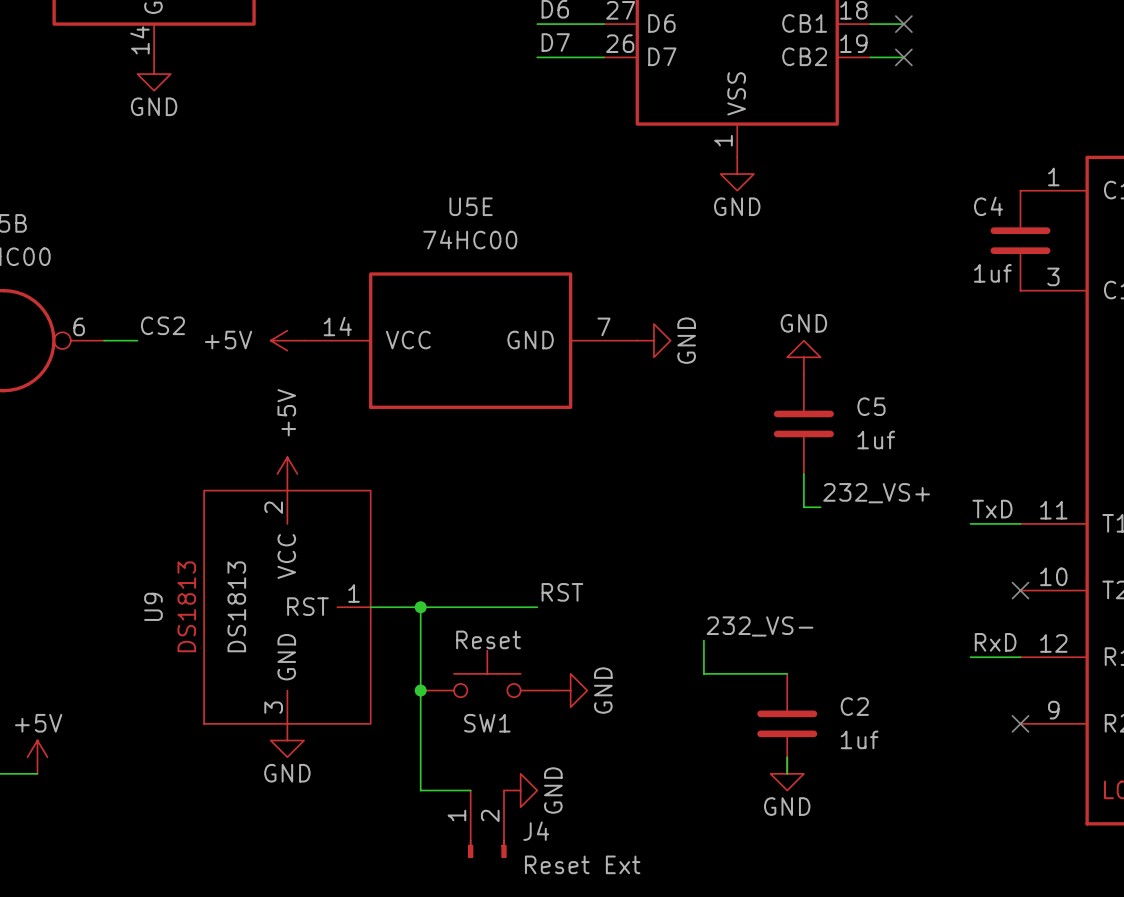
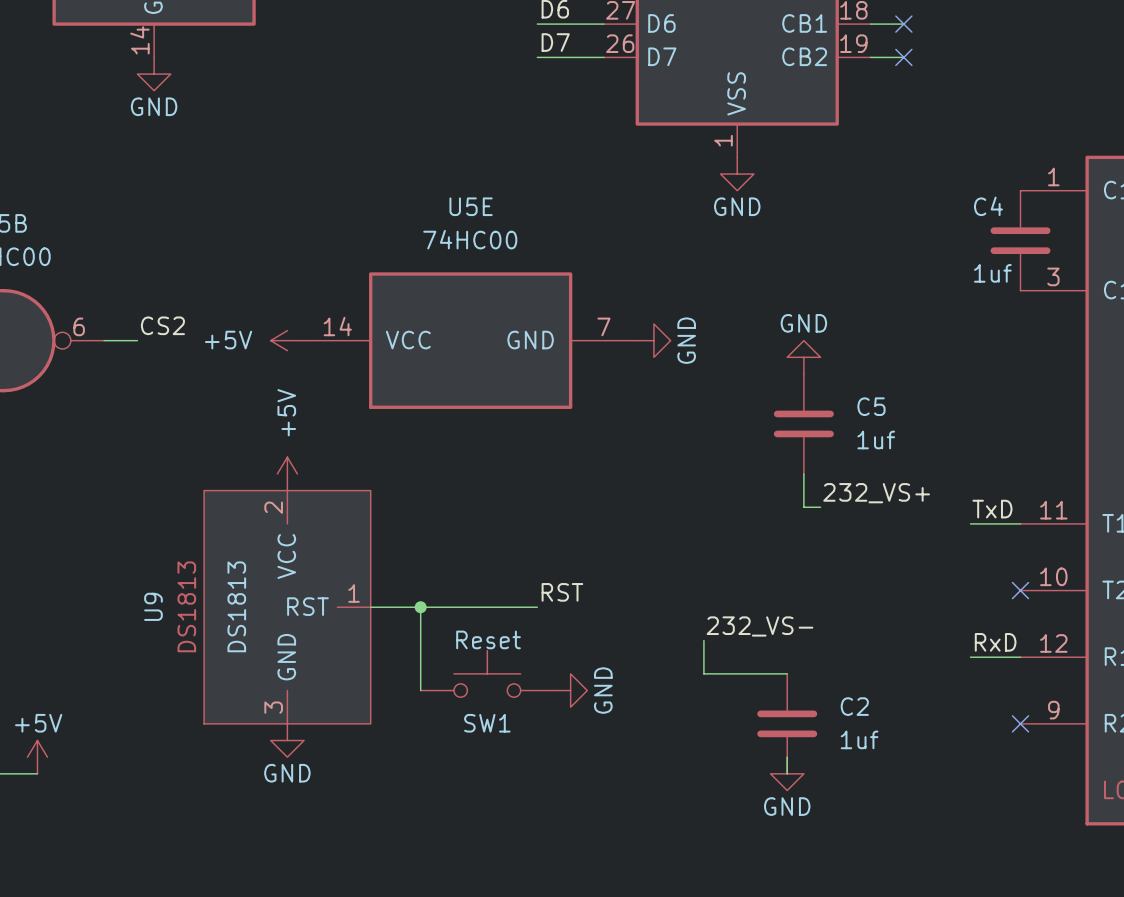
wire: (420, 690) (420, 790) (470, 790) -> none
junction: (420, 690) -> none
power symbol: GND (520, 790) -> none
J4: Reset Ext (487, 824) -> none

